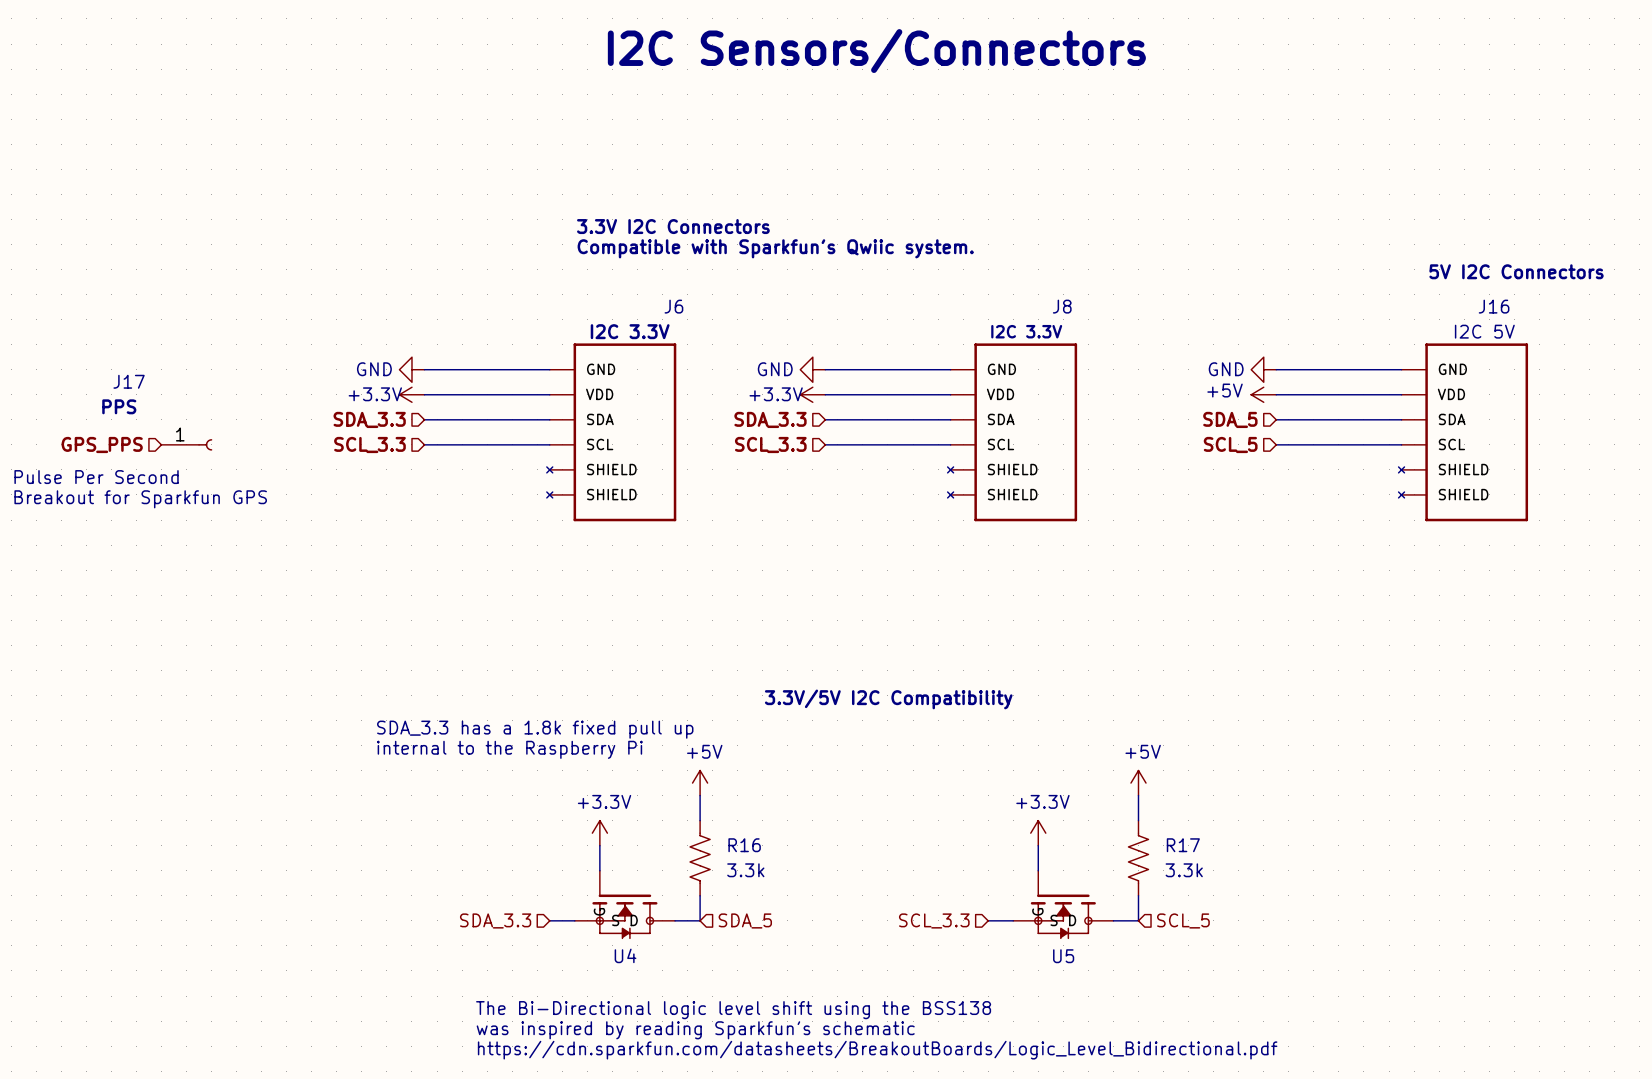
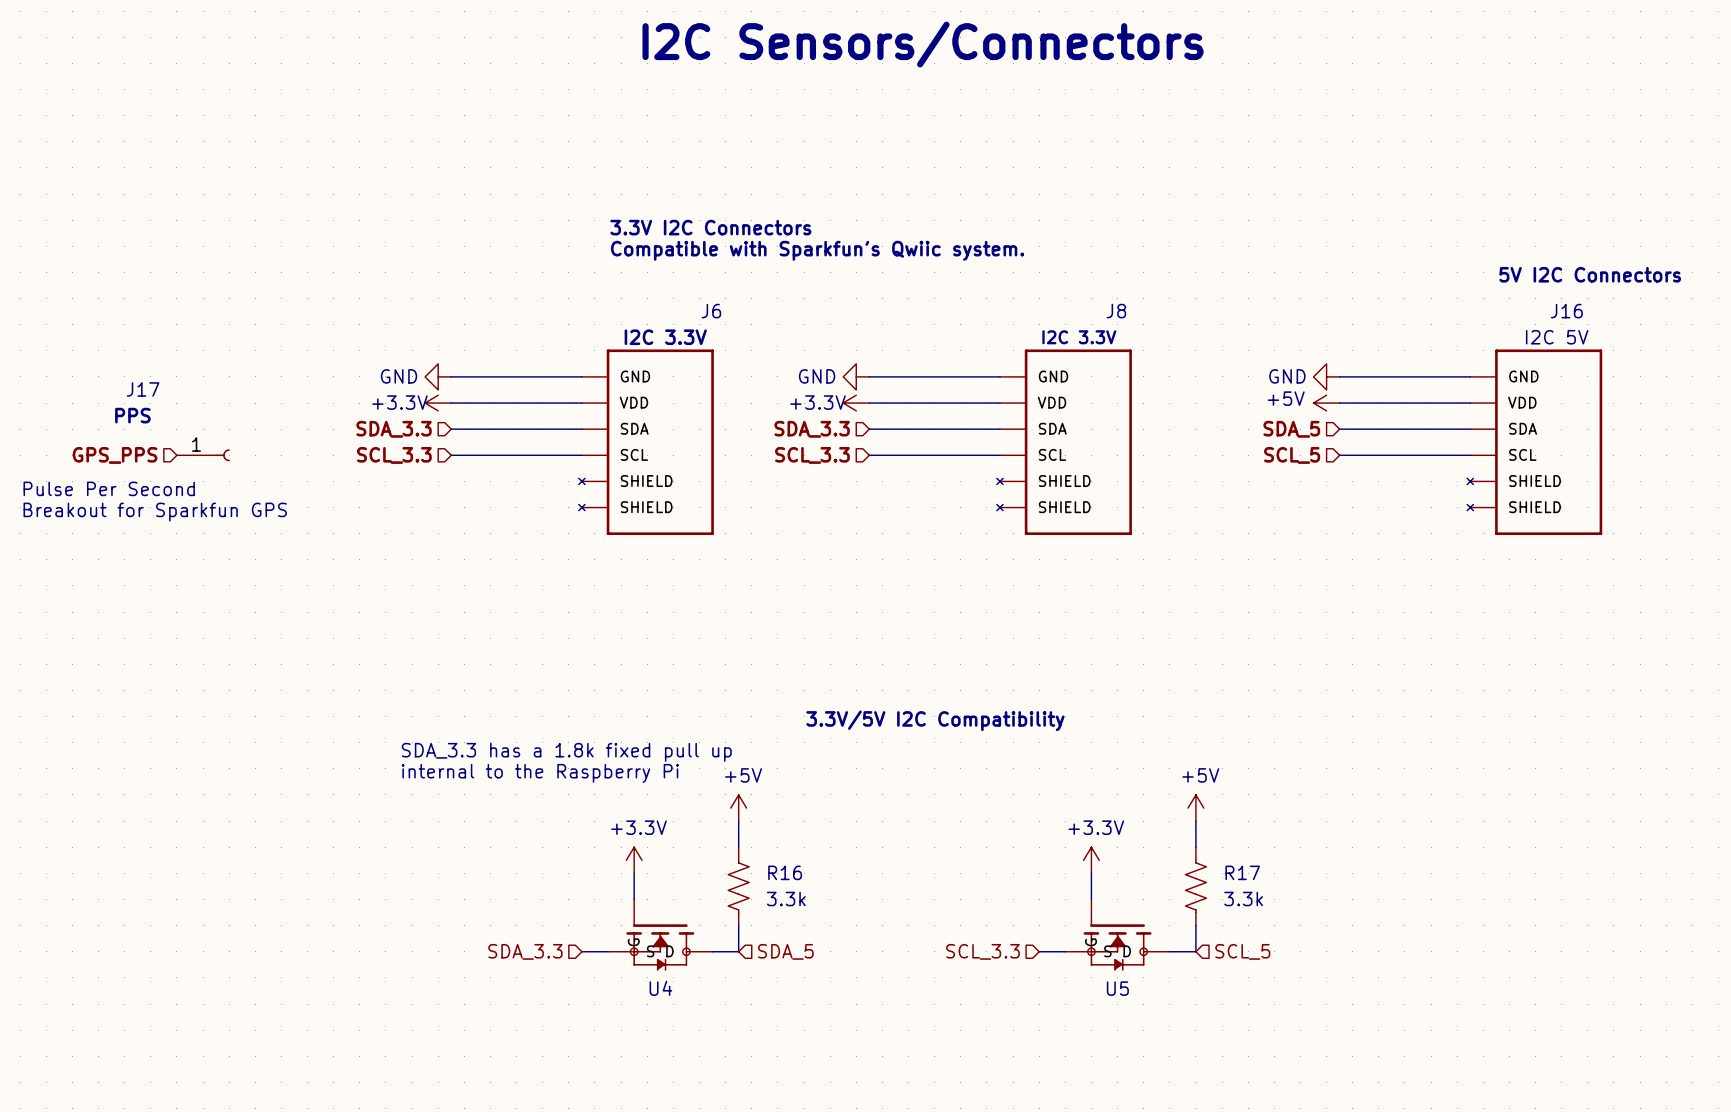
text: The Bi-Directional logic level shift using the BSS138 (733, 1010) -> none
text: was inspired by reading Sparkfun's schematic (695, 1030) -> none
text: https://cdn.sparkfun.com/datasheets/BreakoutBoards/Logic_Level_Bidirectional.pdf (877, 1050) -> none

